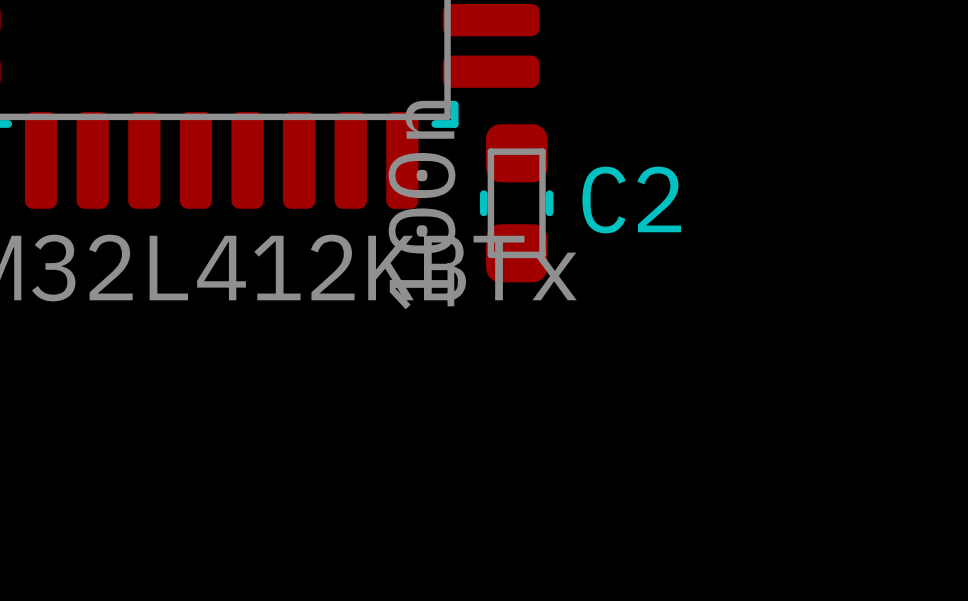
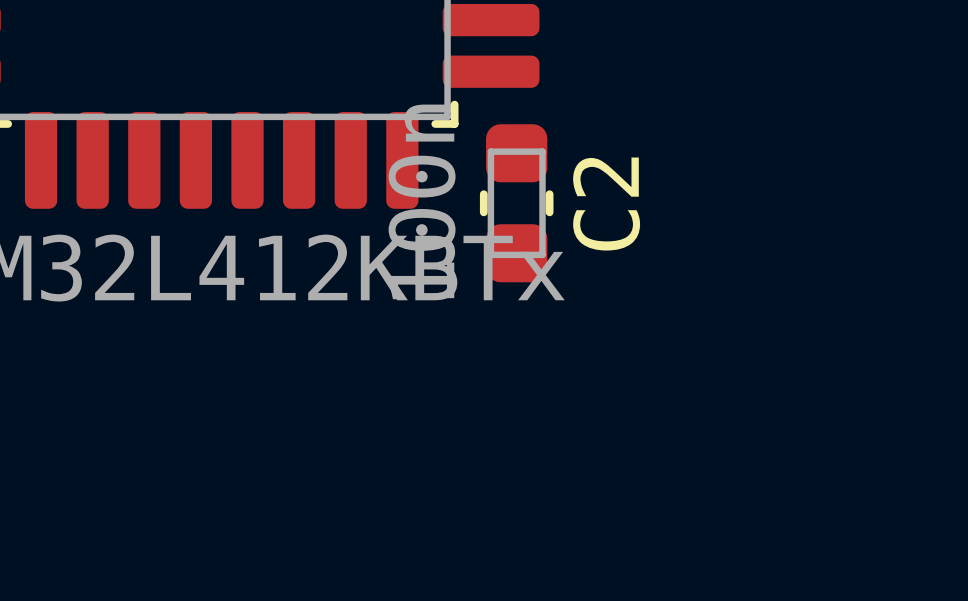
C2 name rotation: 0° (631, 200) -> 90° counterclockwise (606, 204)

